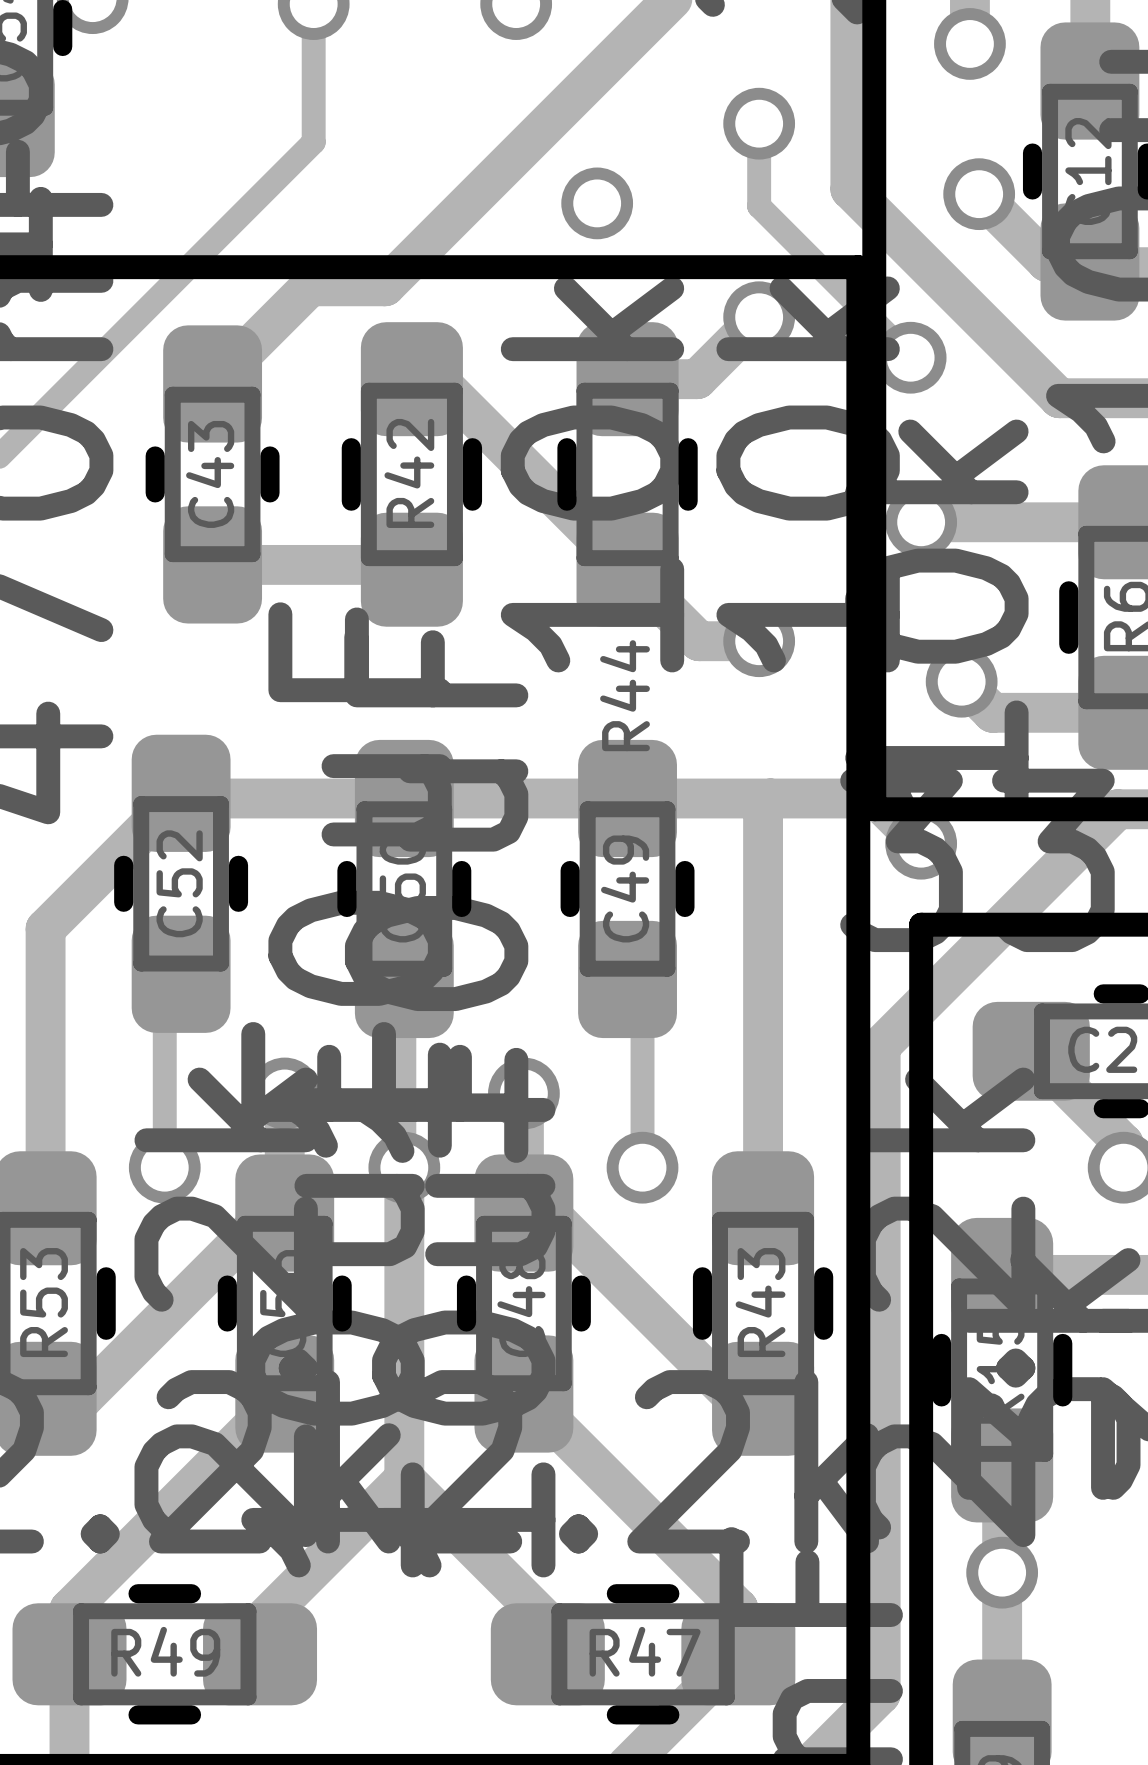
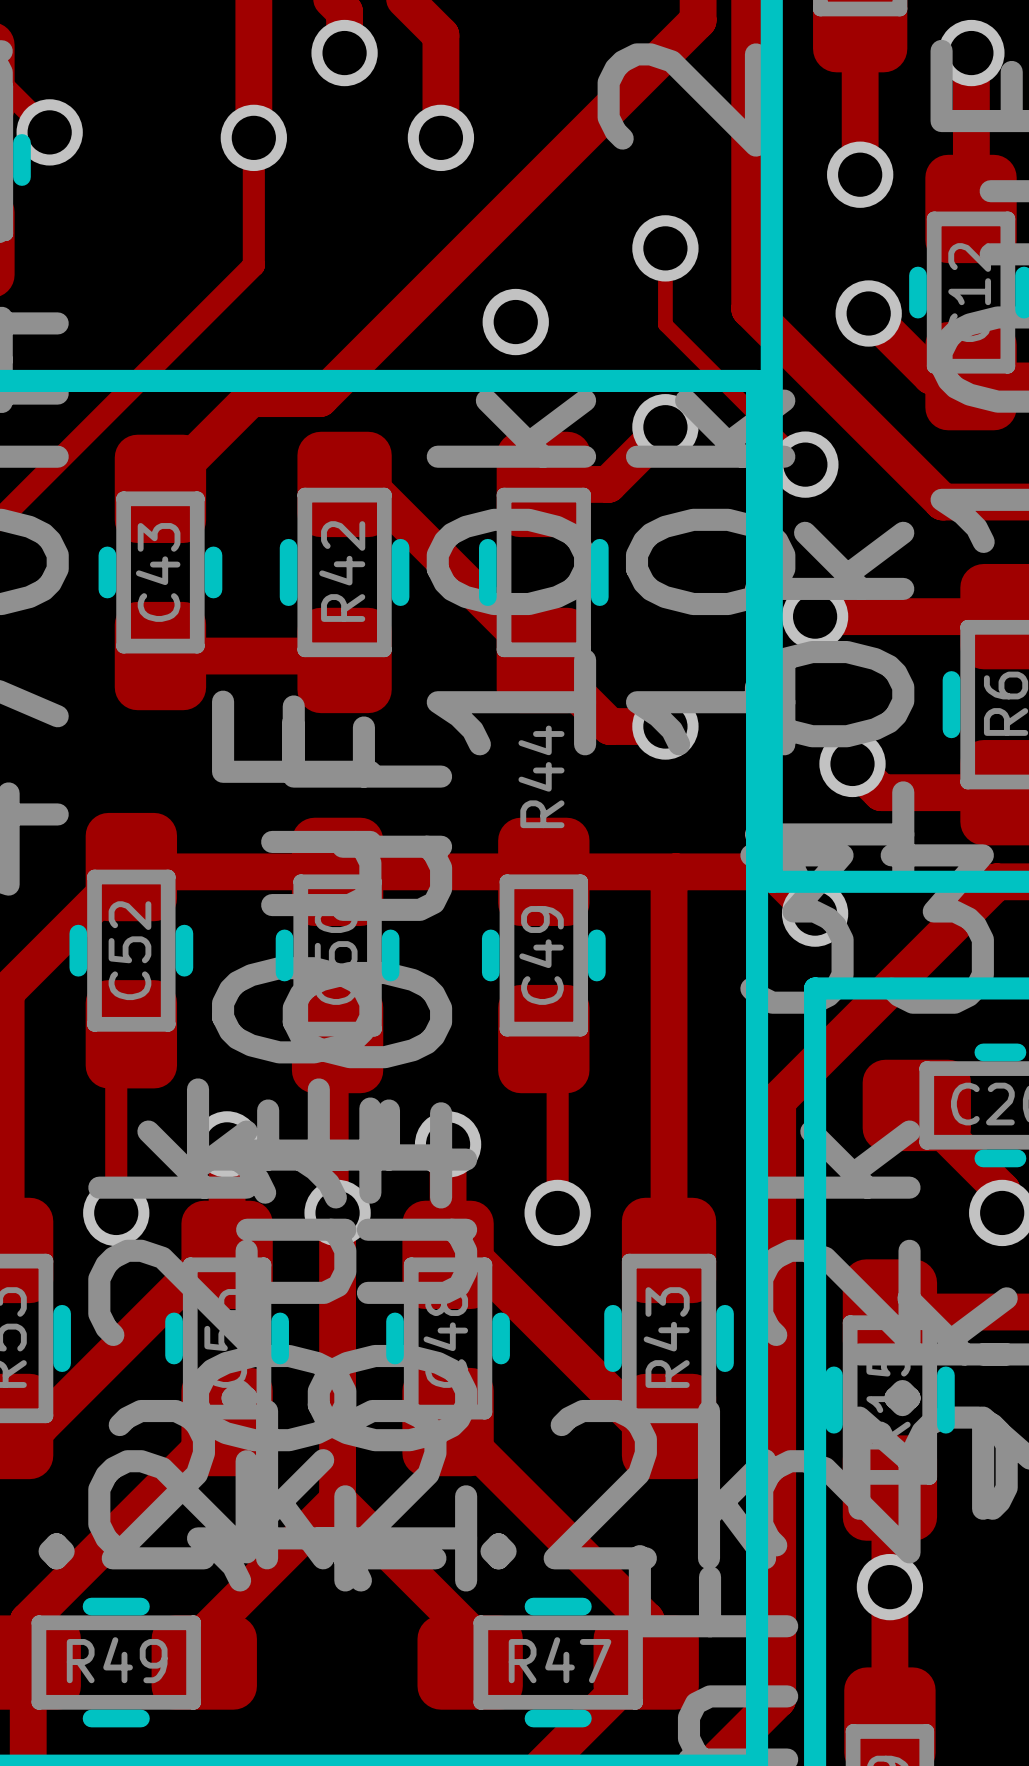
track width: thick (759, 123) (759, 206) (910, 357) -> thin (665, 248) (665, 324) (805, 464)

